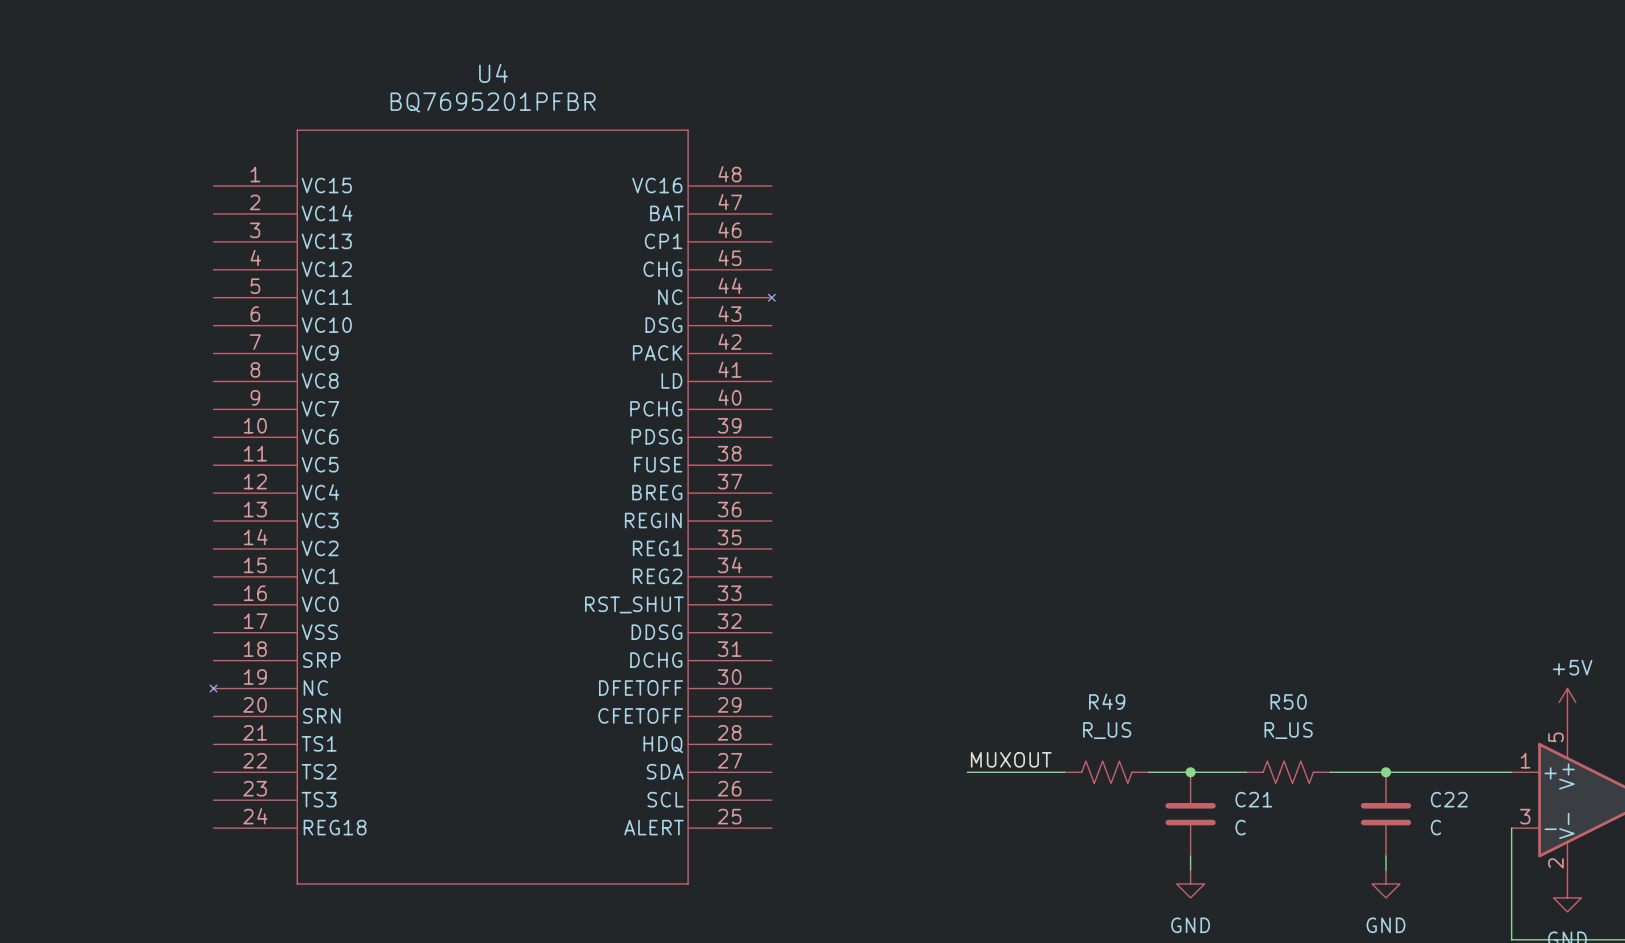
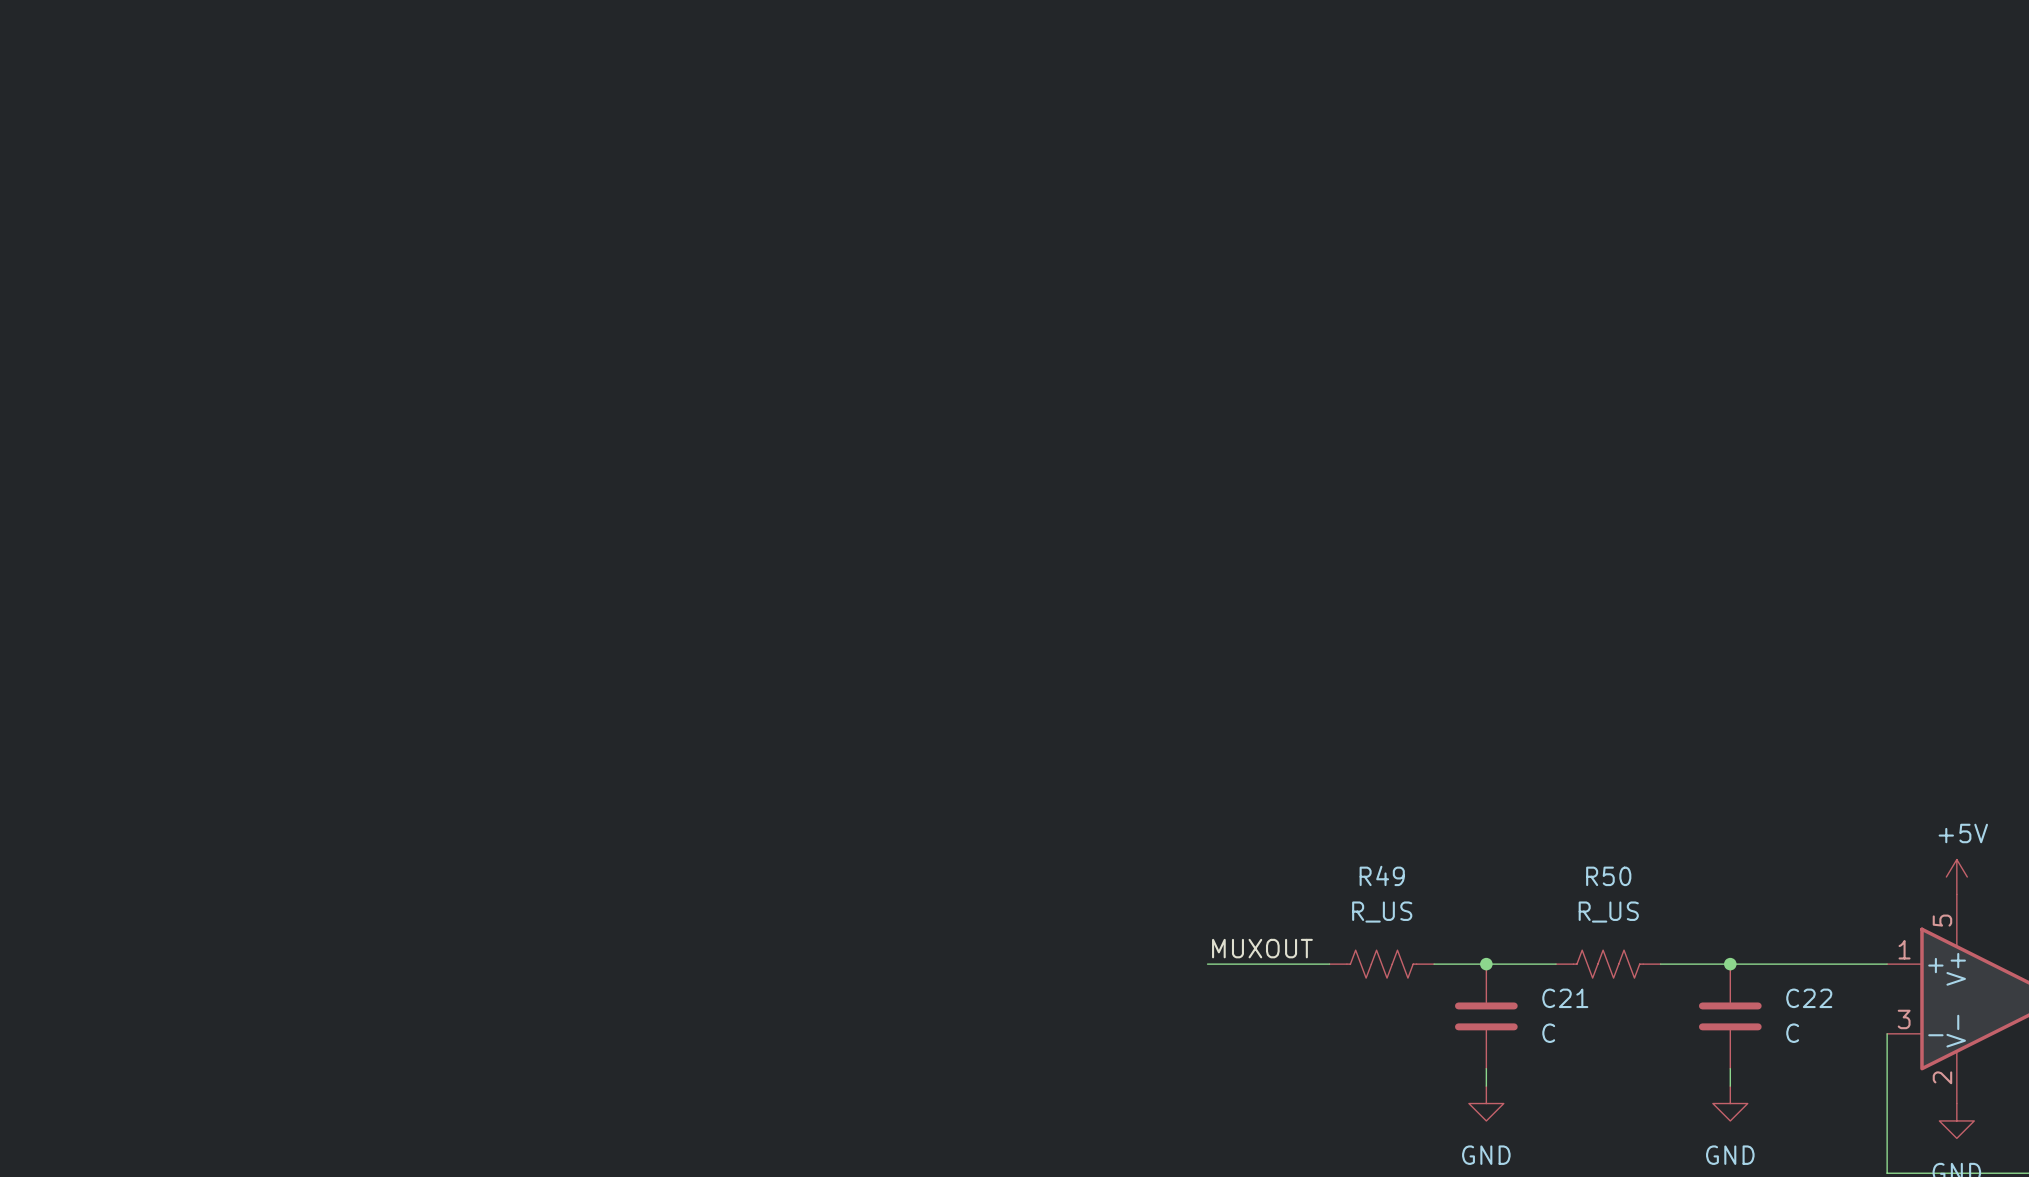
U4: BQ7695201PFBR (492, 507) -> none

